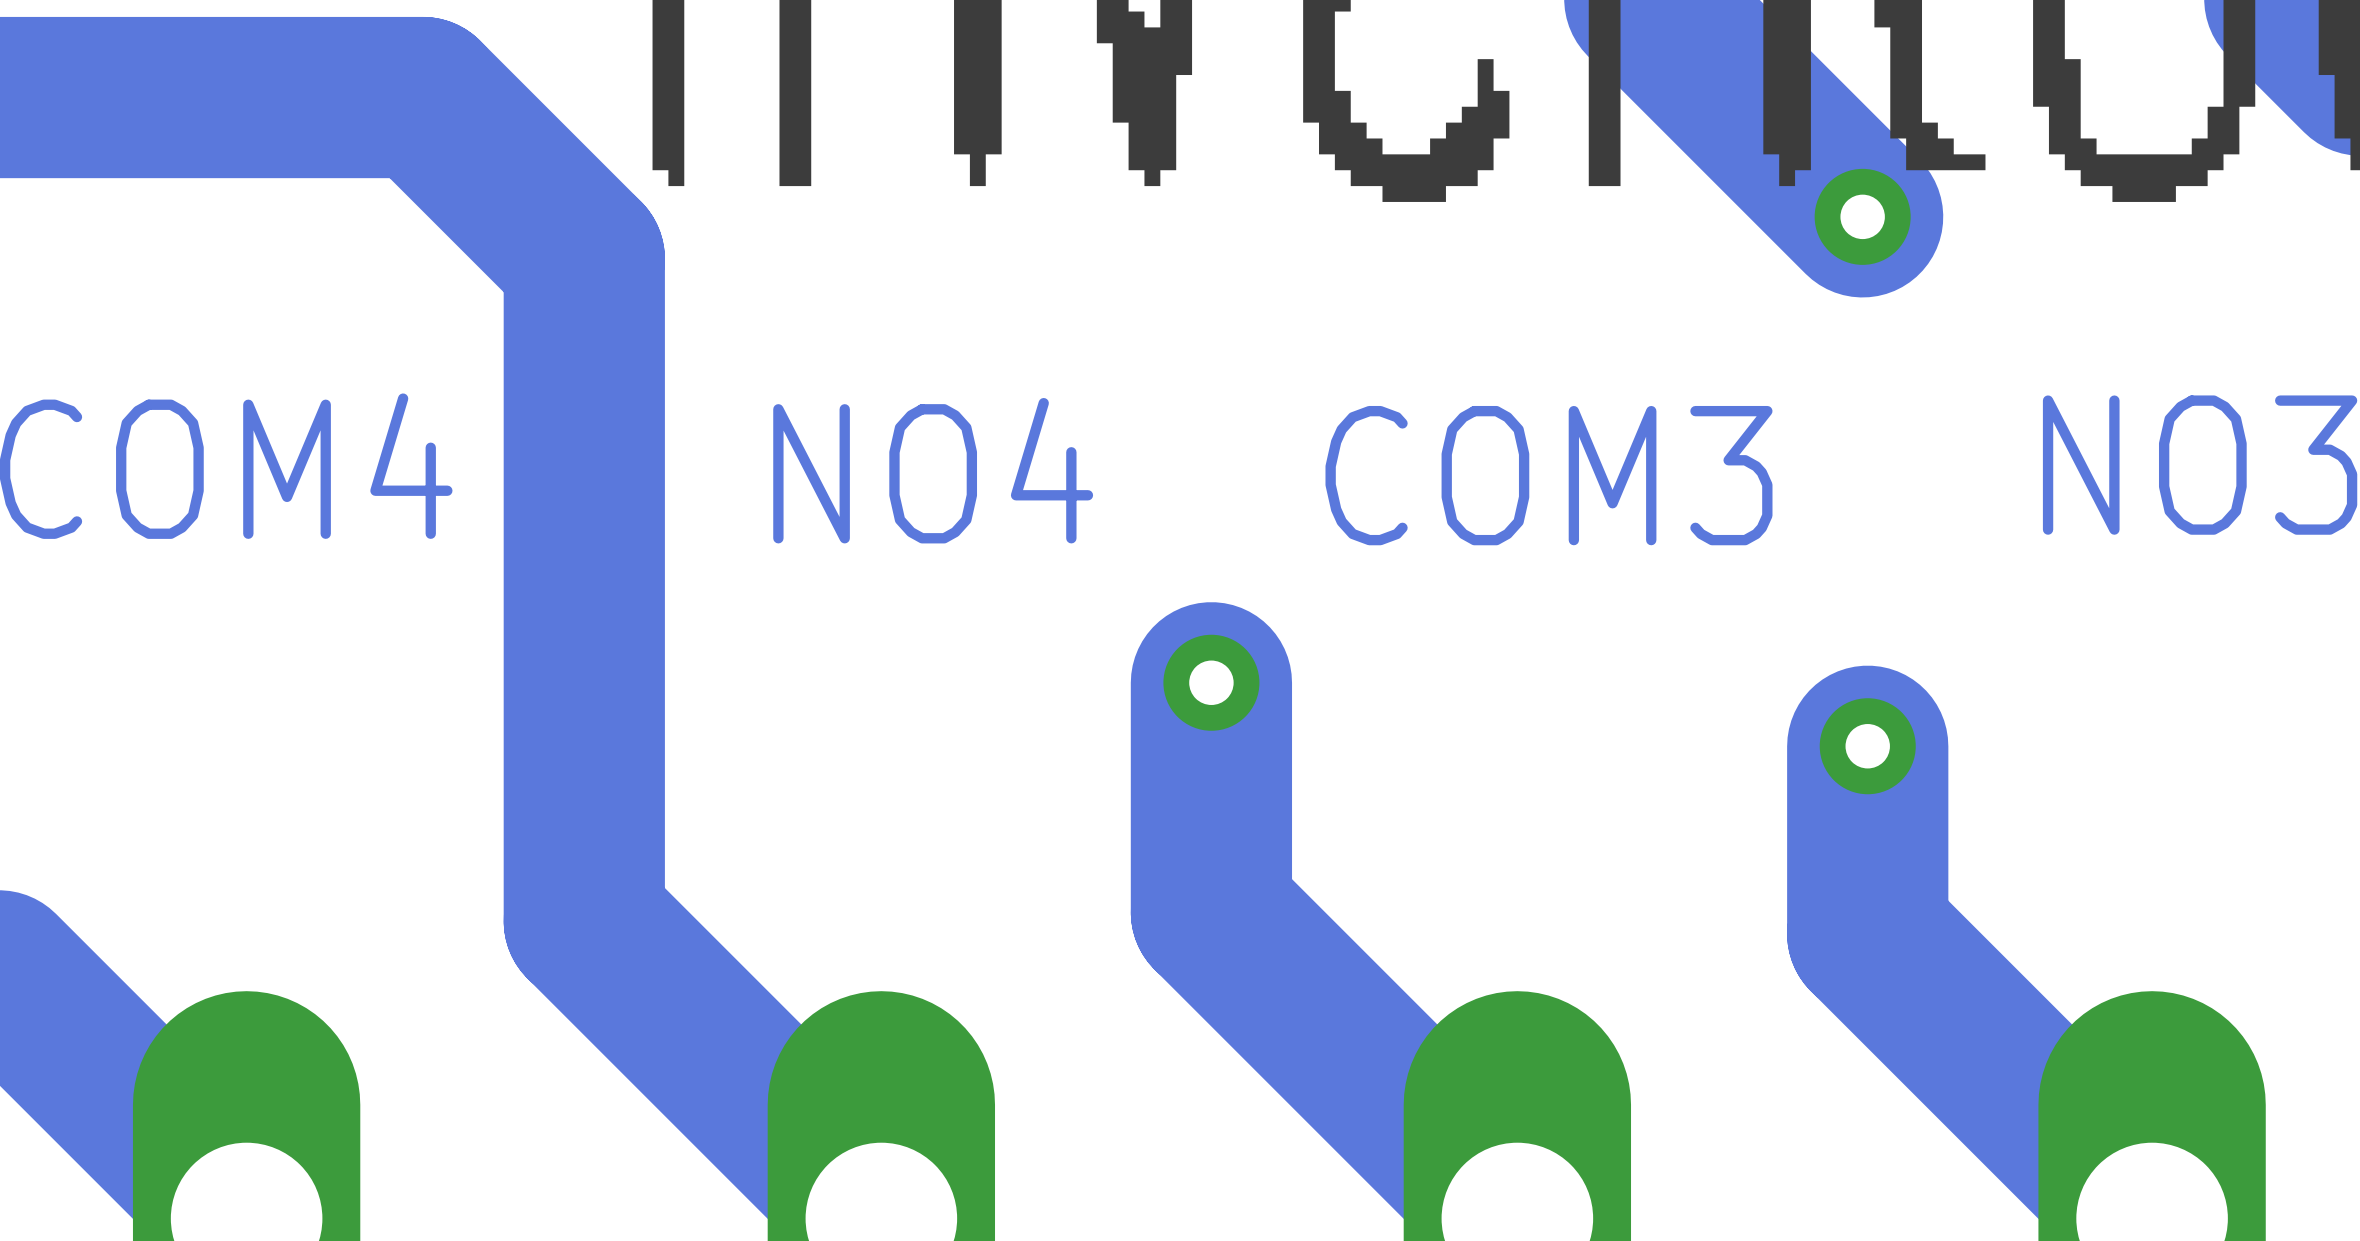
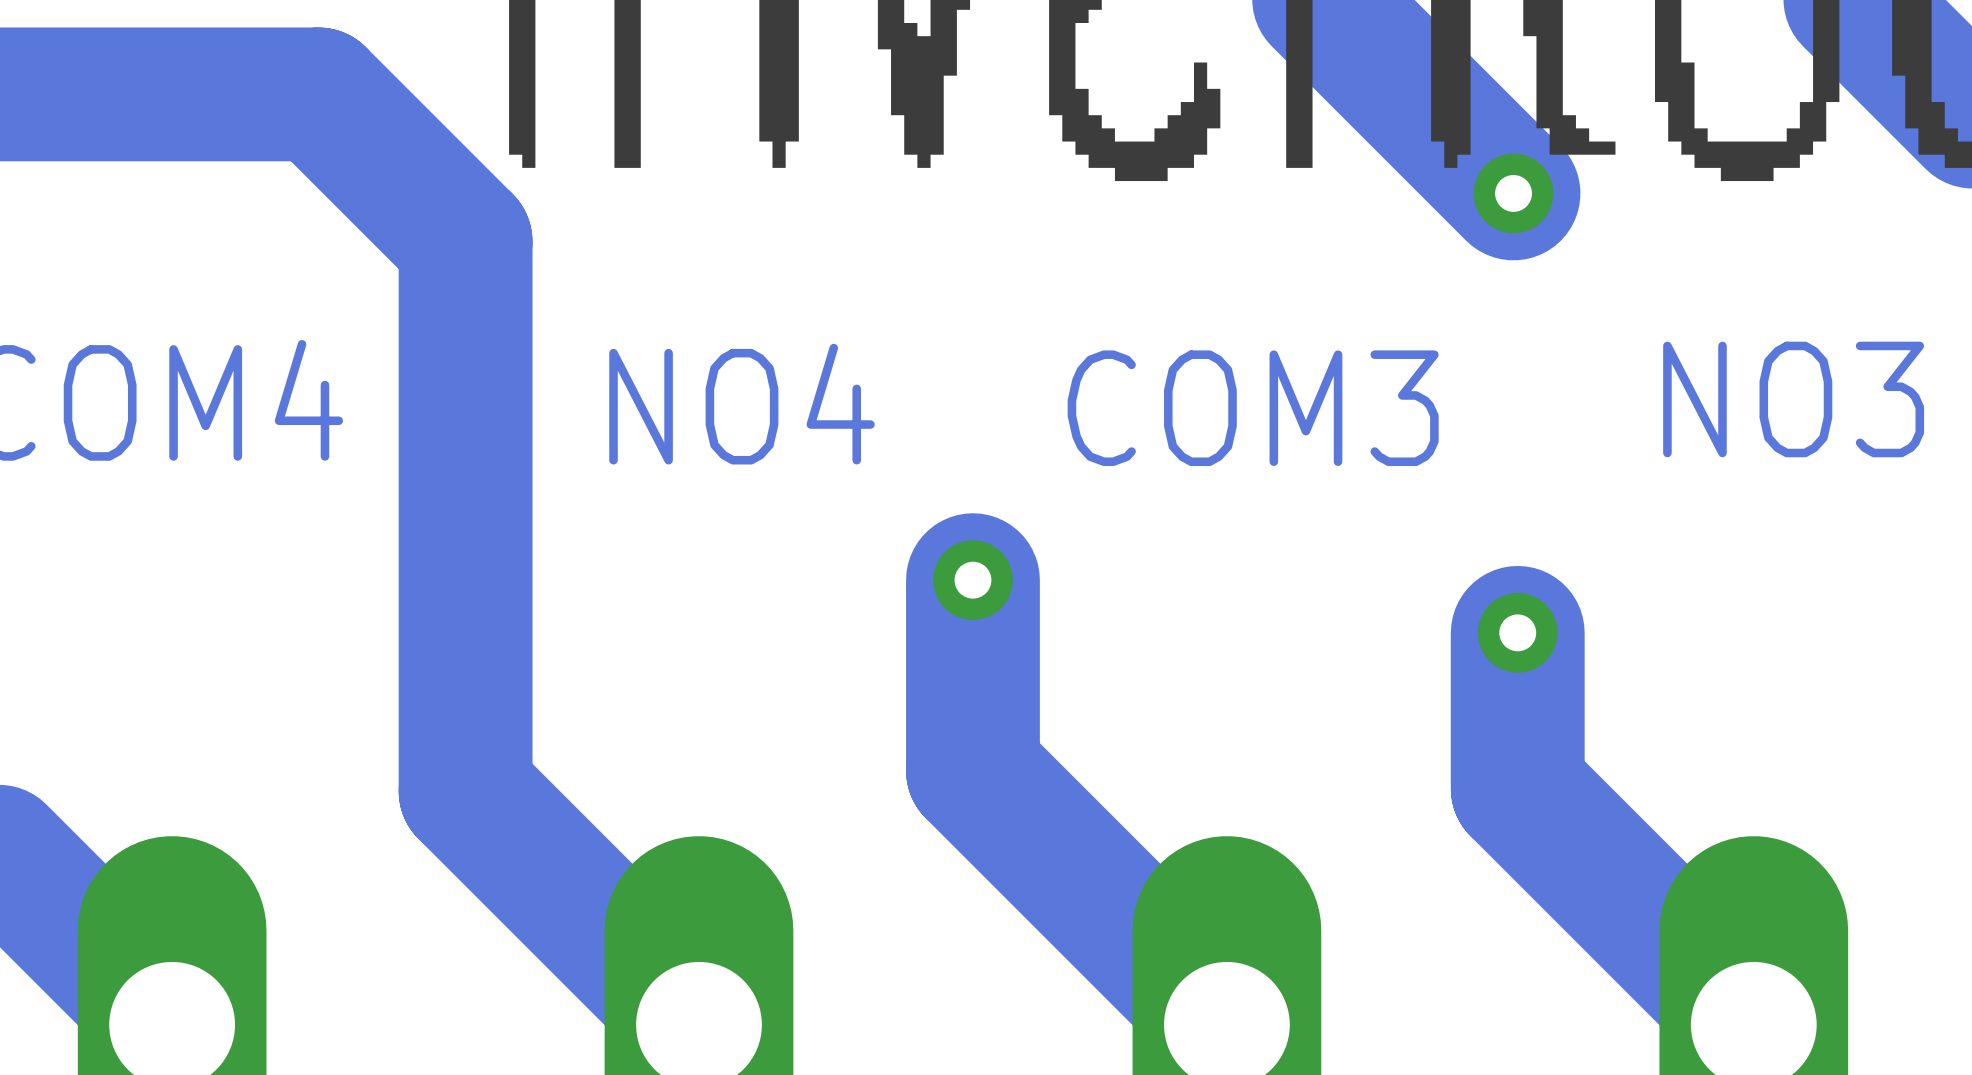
track: (584, 258) (584, 921) (600, 937) -> (452, 228) (465, 241) (465, 791)

